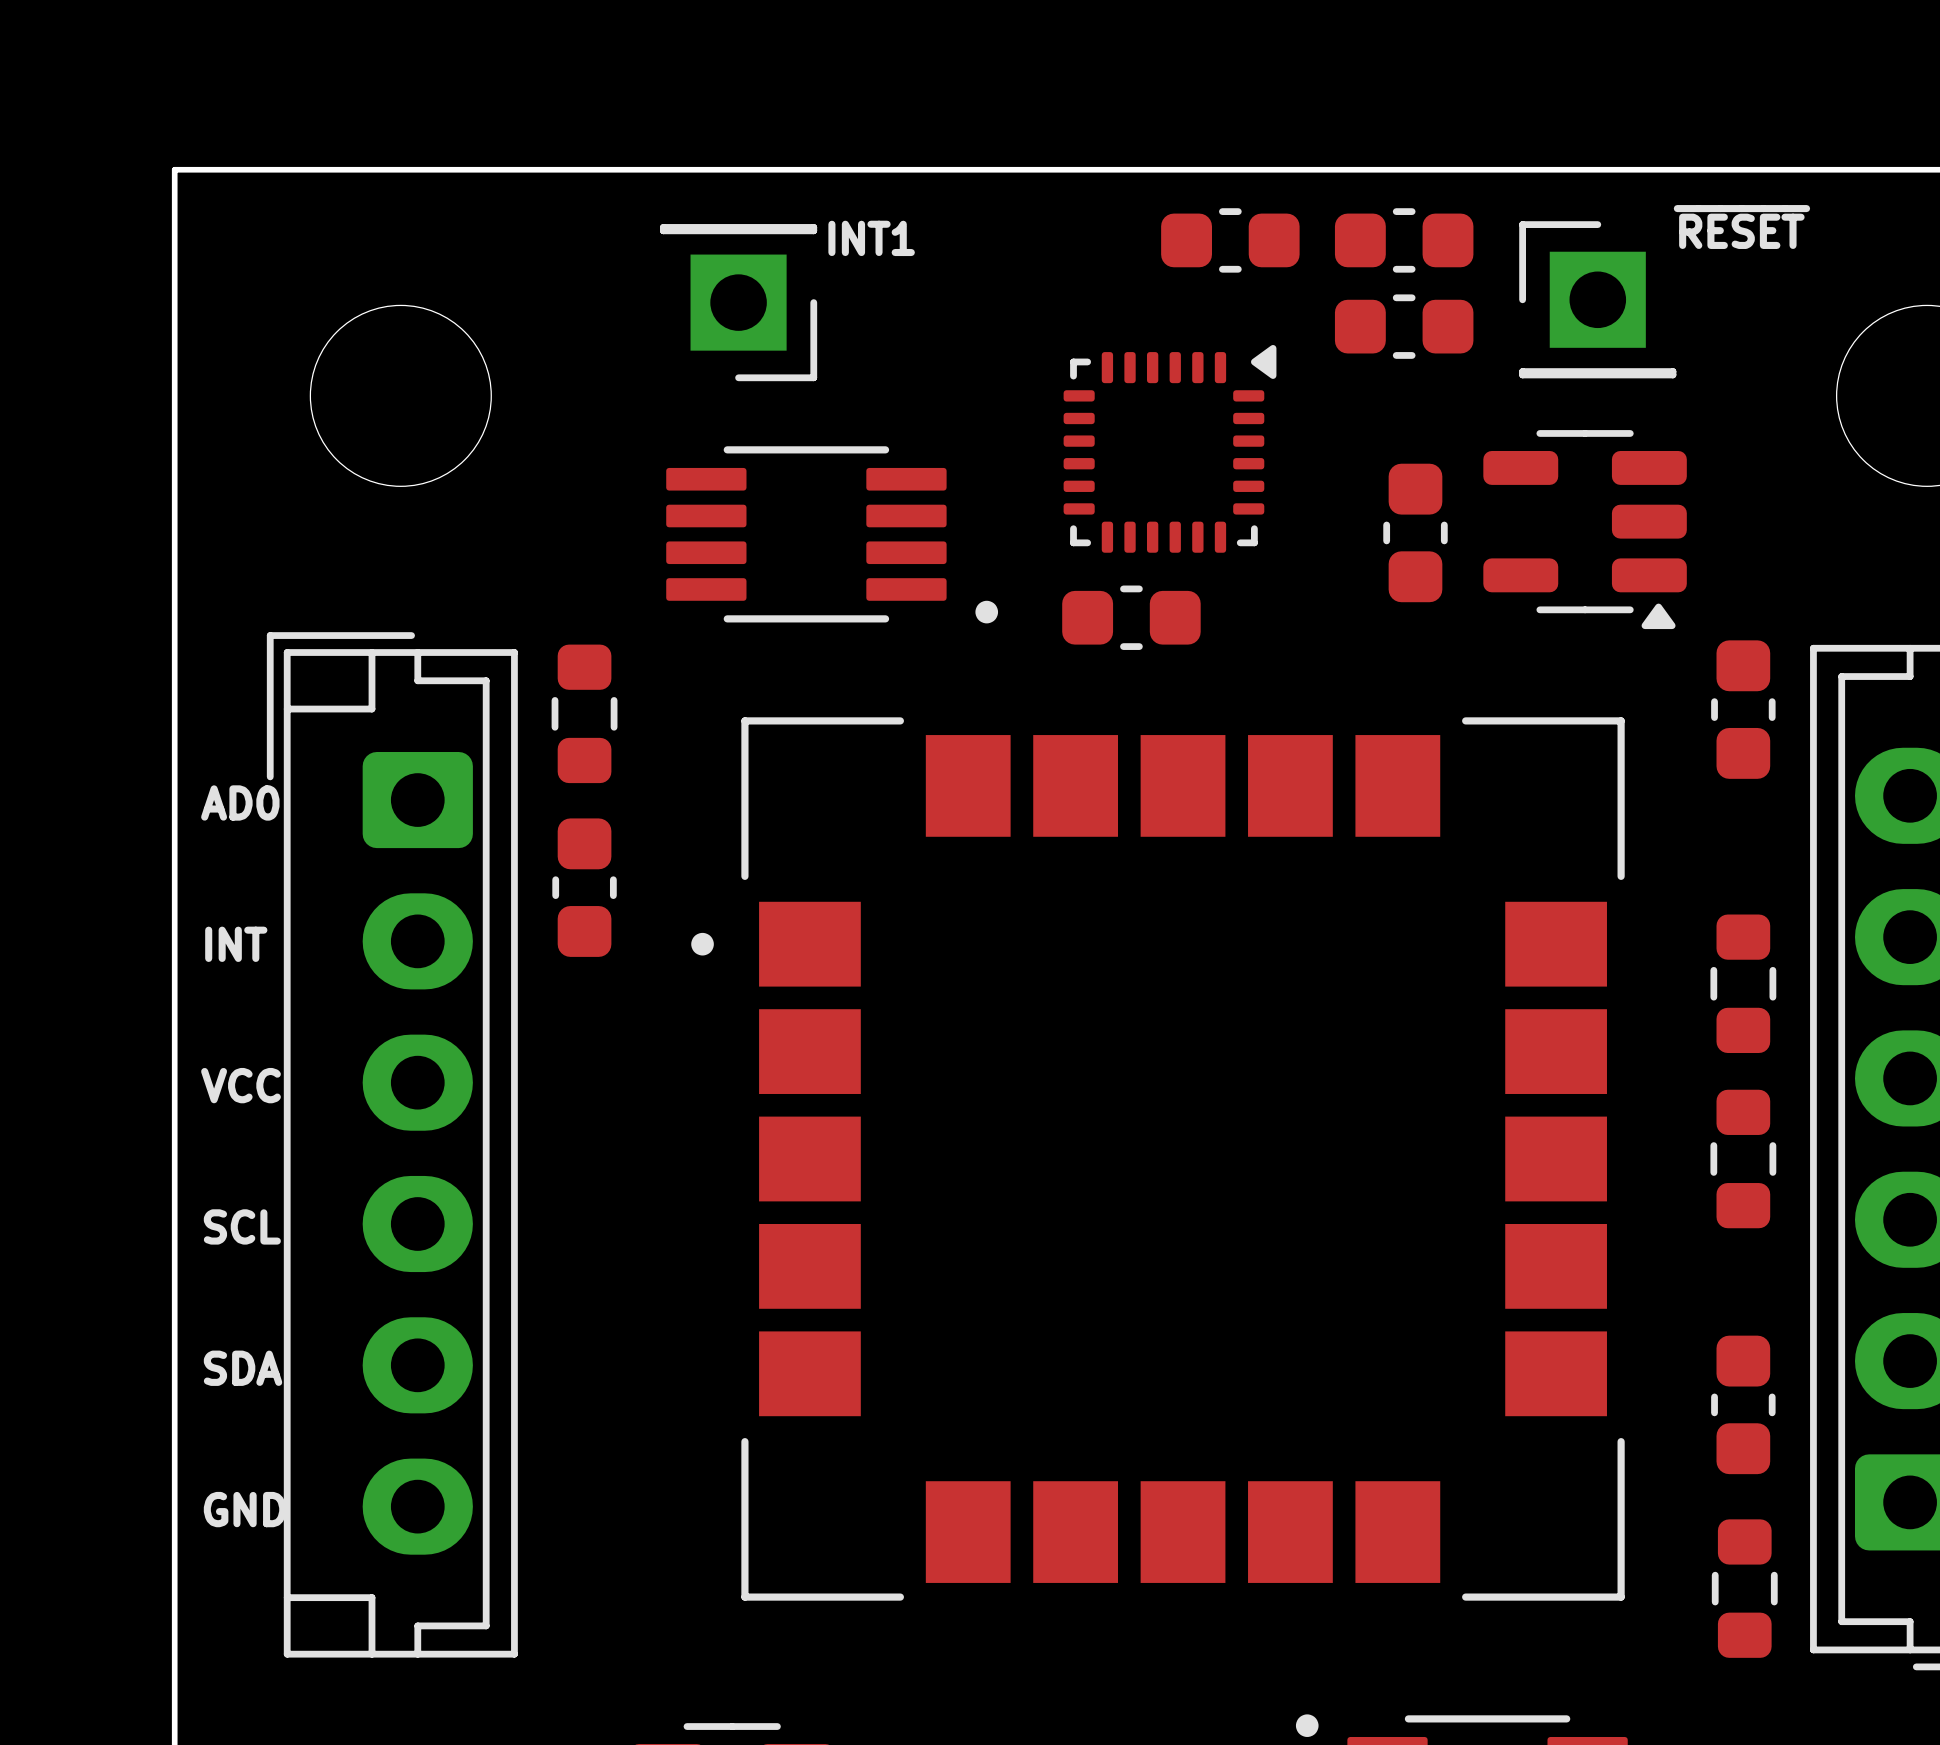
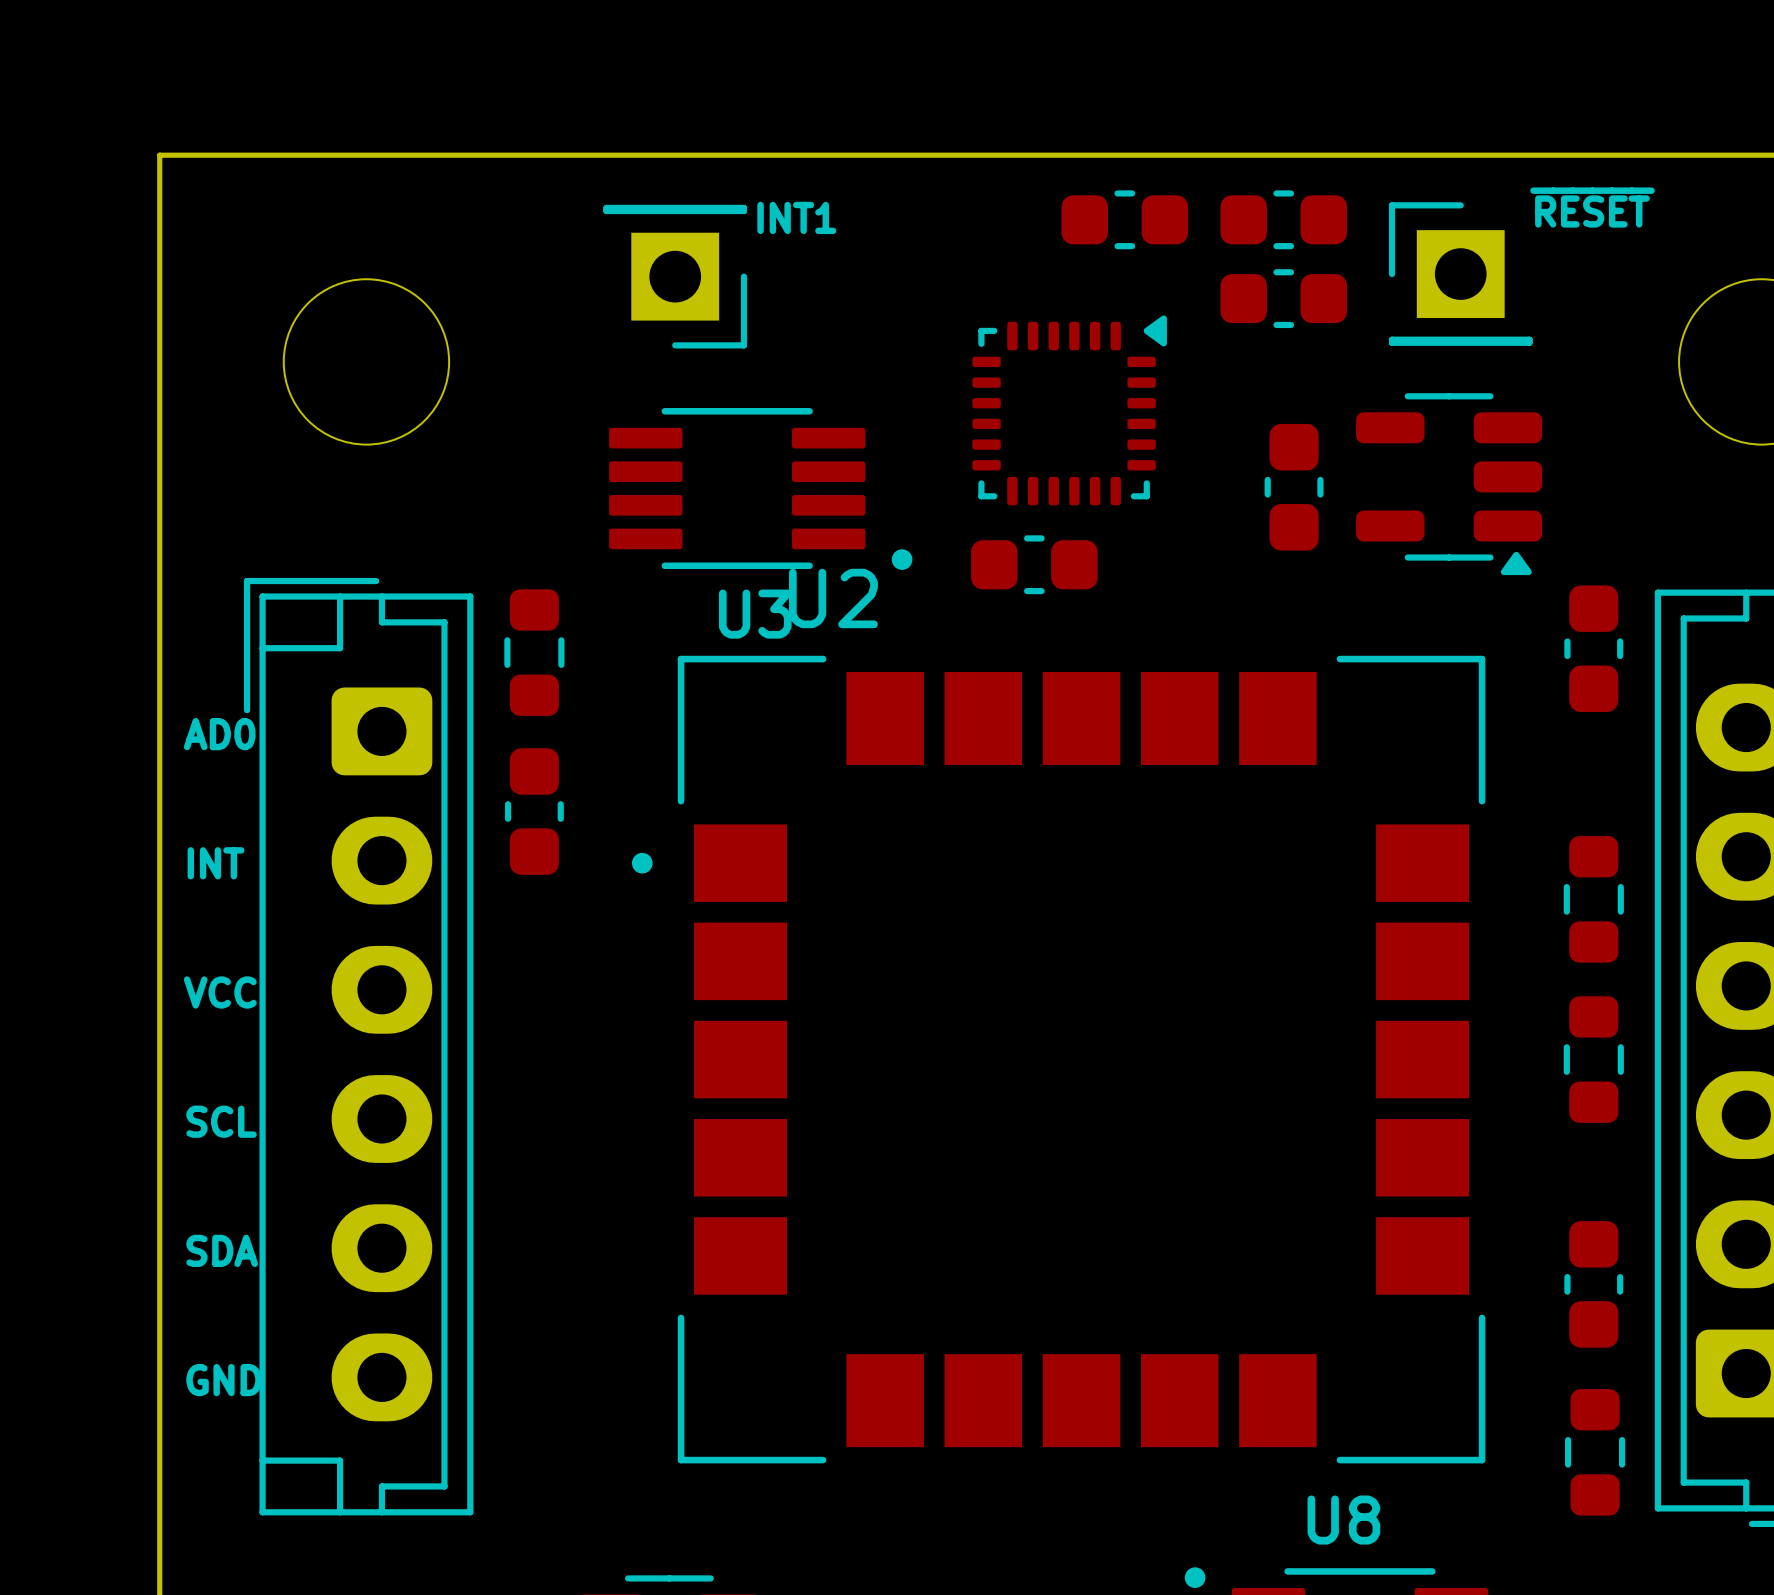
U2 name: none -> U2 (833, 598)
U3 name: none -> U3 (755, 614)
U8 name: none -> U8 (1343, 1520)

